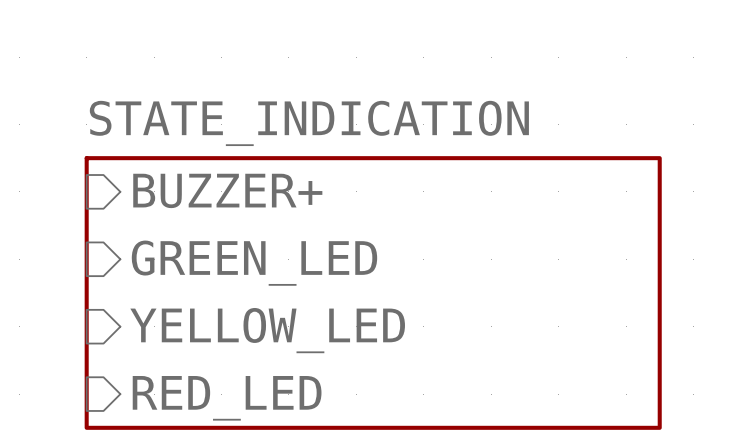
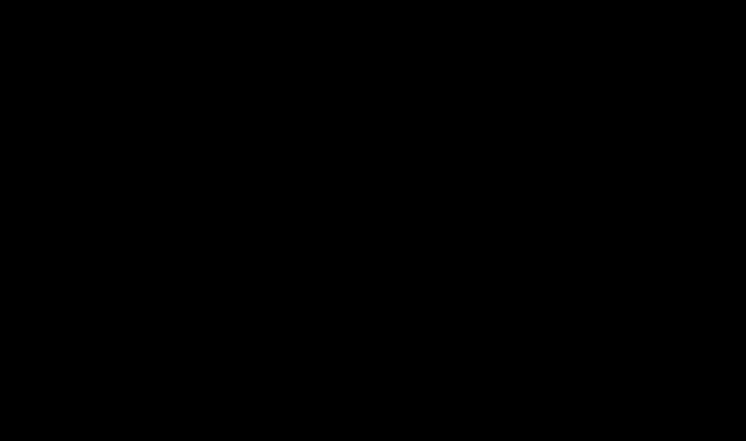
sheet pin: BUZZER+ (227, 190) -> none
sheet pin: GREEN_LED (254, 263) -> none
sheet STATE_INDICATION: (373, 292) -> none
sheet pin: YELLOW_LED (267, 330) -> none
sheet pin: RED_LED (227, 398) -> none

